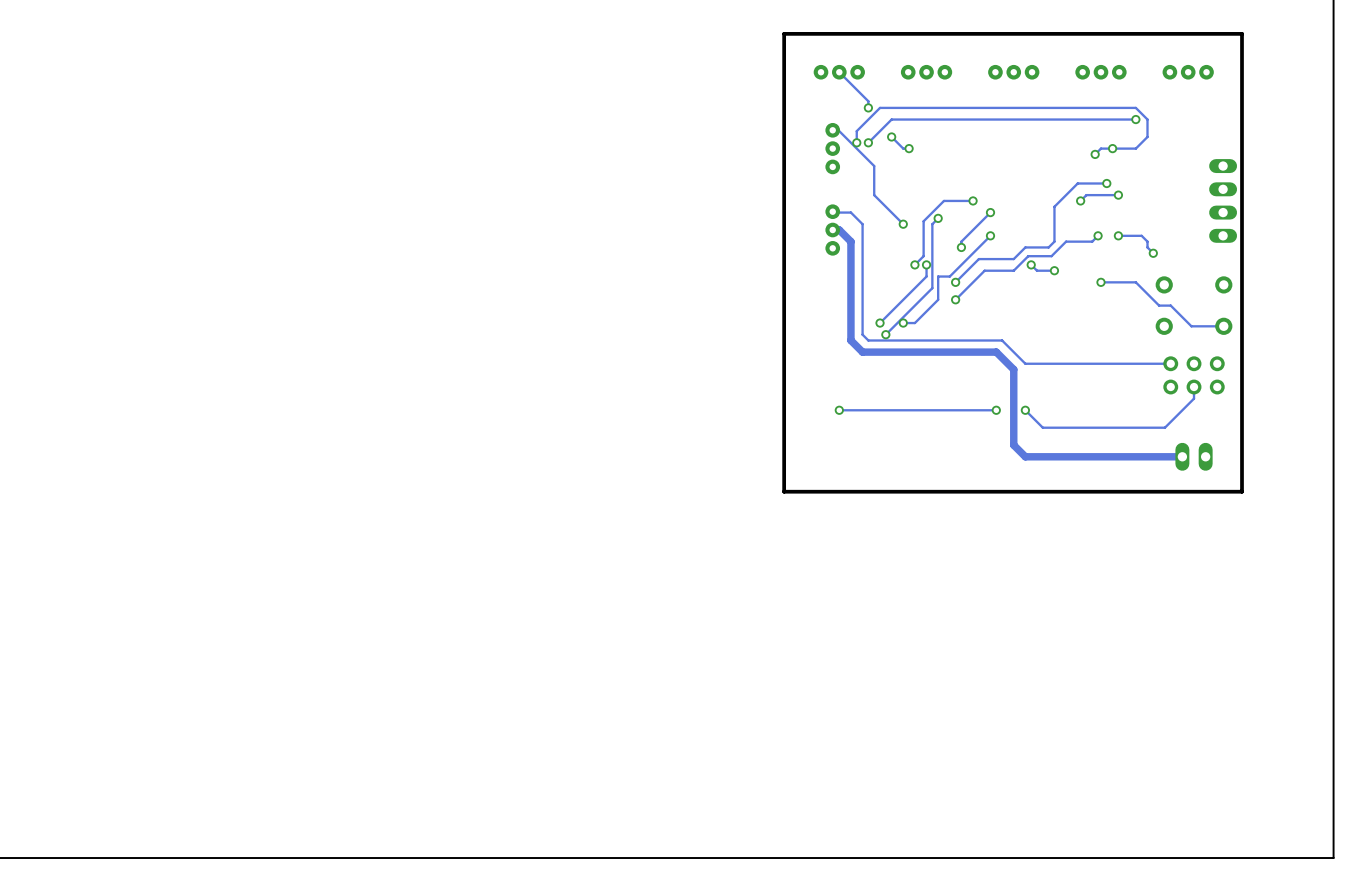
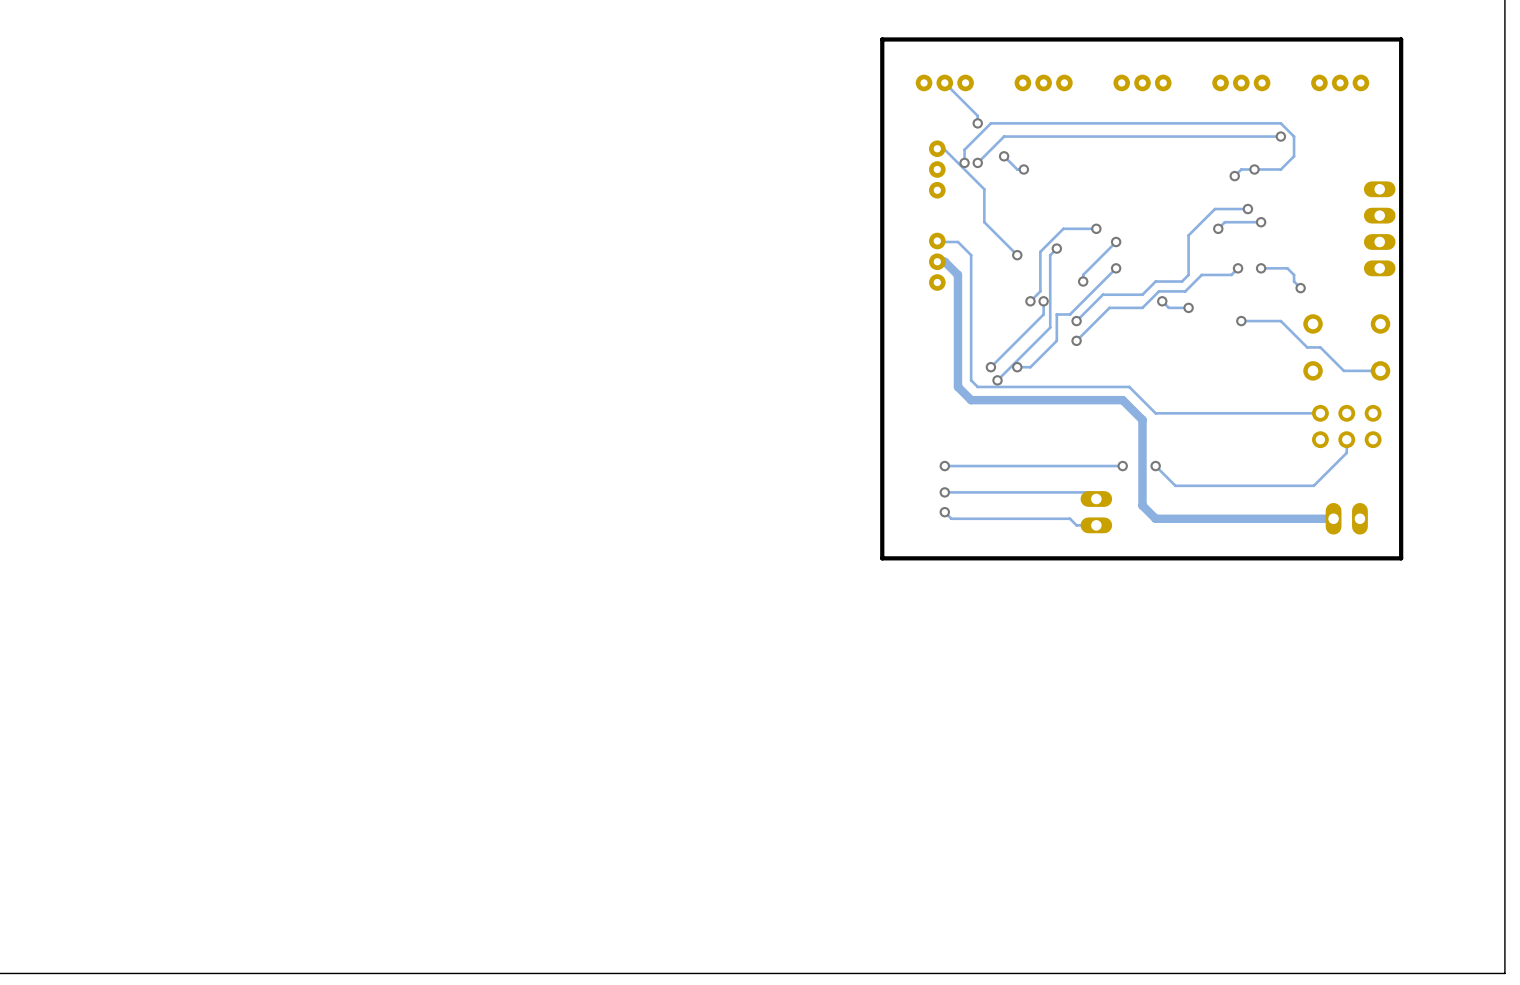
track: none -> (944, 492) (1089, 492) (1096, 498)
via: none -> (944, 492)
track: none -> (944, 512) (951, 518) (1070, 518) (1076, 525) (1096, 525)
via: none -> (944, 512)
part: none -> (1096, 512)

